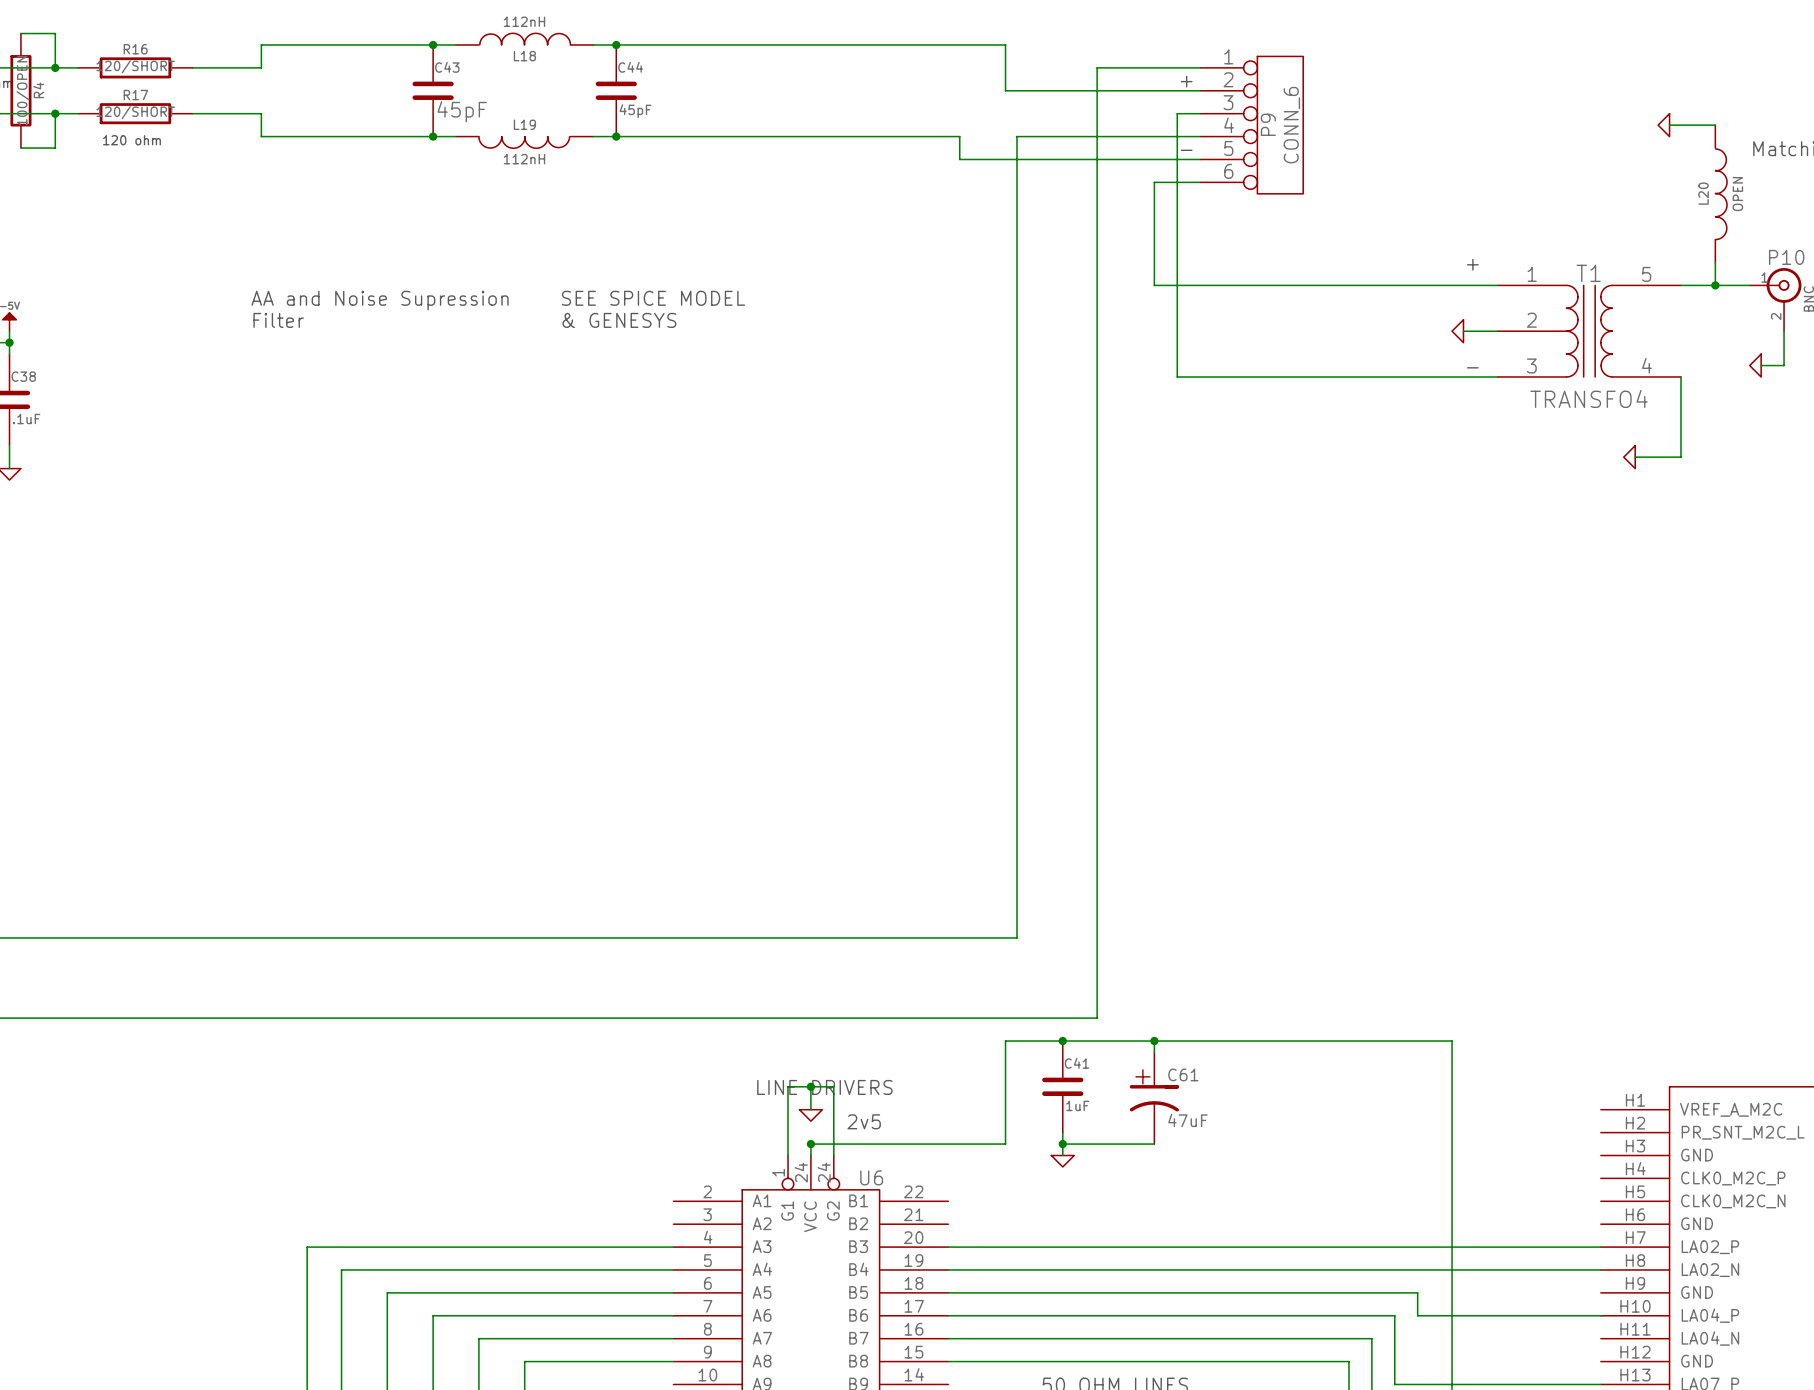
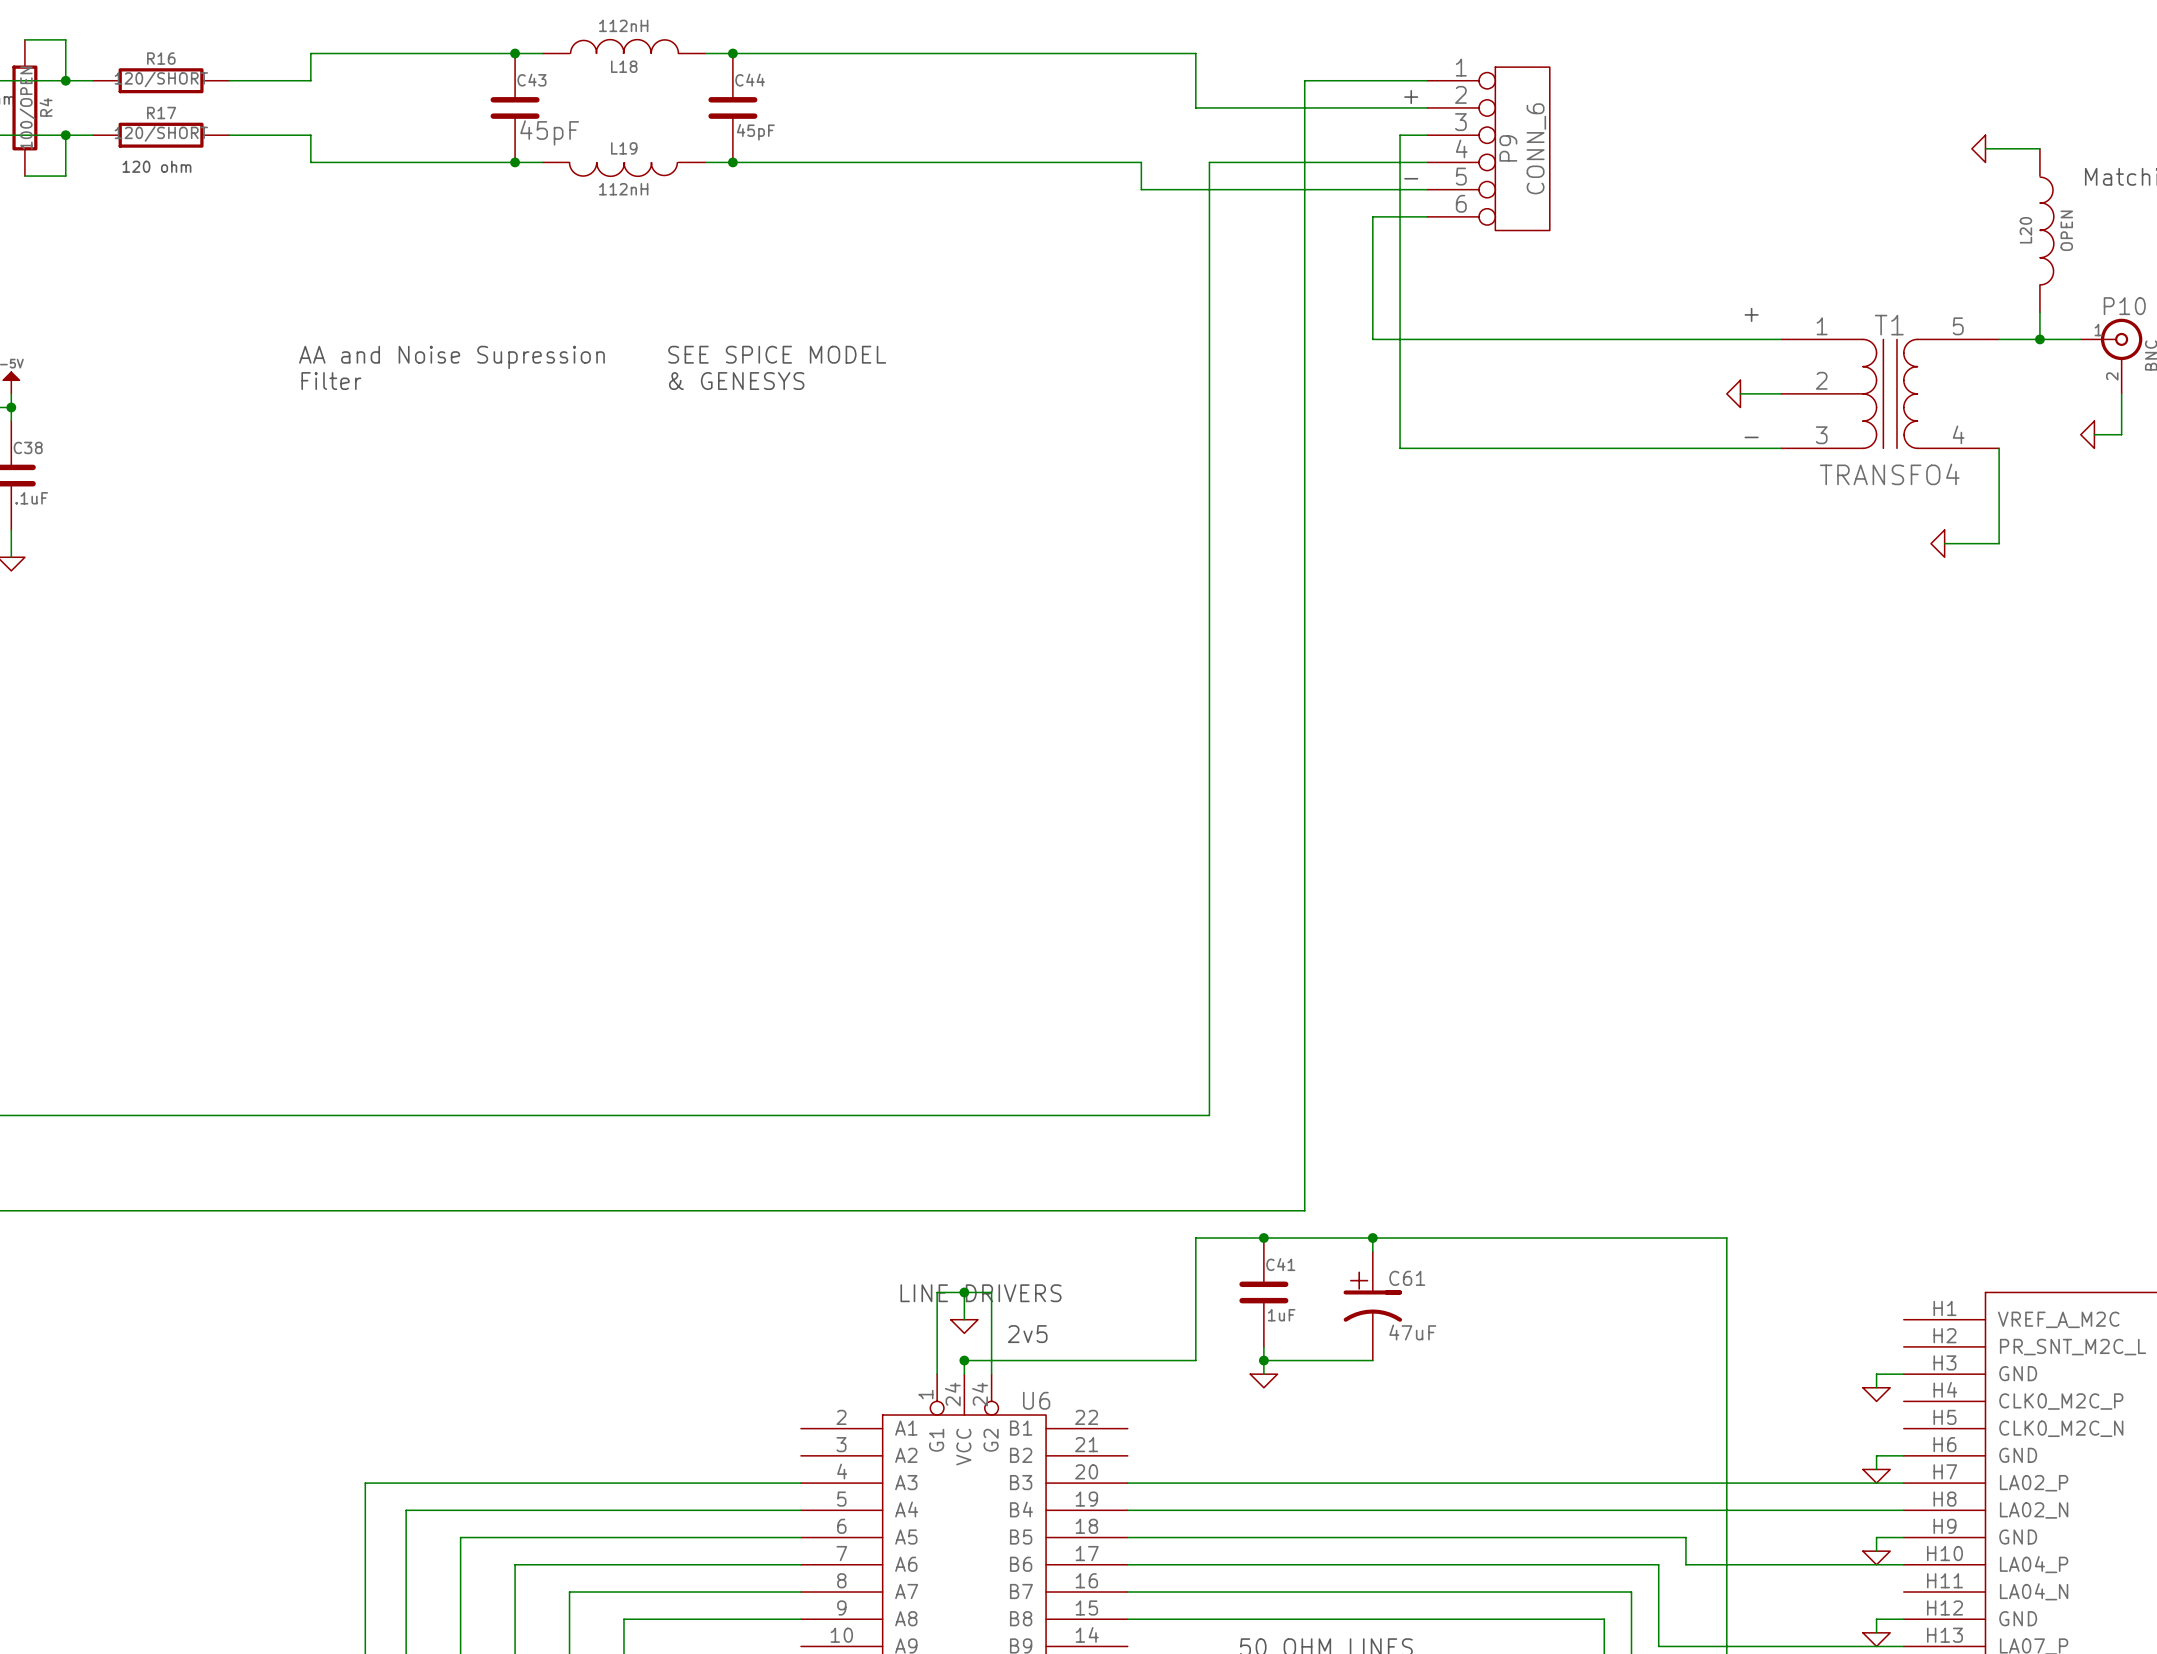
wire: none -> (1903, 1374) (1876, 1374) (1876, 1387)
power symbol: none -> (1876, 1394)
wire: none -> (1903, 1455) (1876, 1455) (1876, 1469)
power symbol: none -> (1876, 1476)
wire: none -> (1903, 1537) (1876, 1537) (1876, 1551)
power symbol: none -> (1876, 1557)
wire: none -> (1903, 1619) (1876, 1619) (1876, 1632)
power symbol: none -> (1876, 1639)

